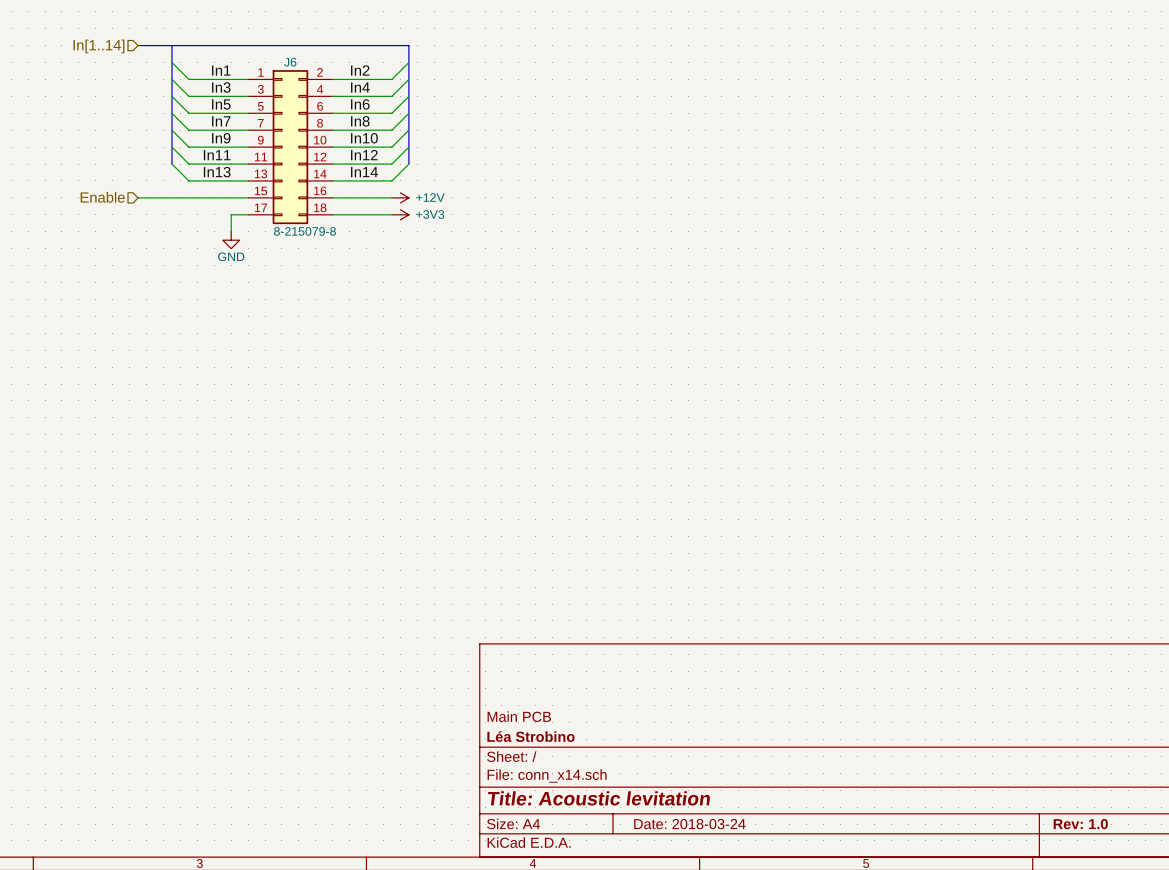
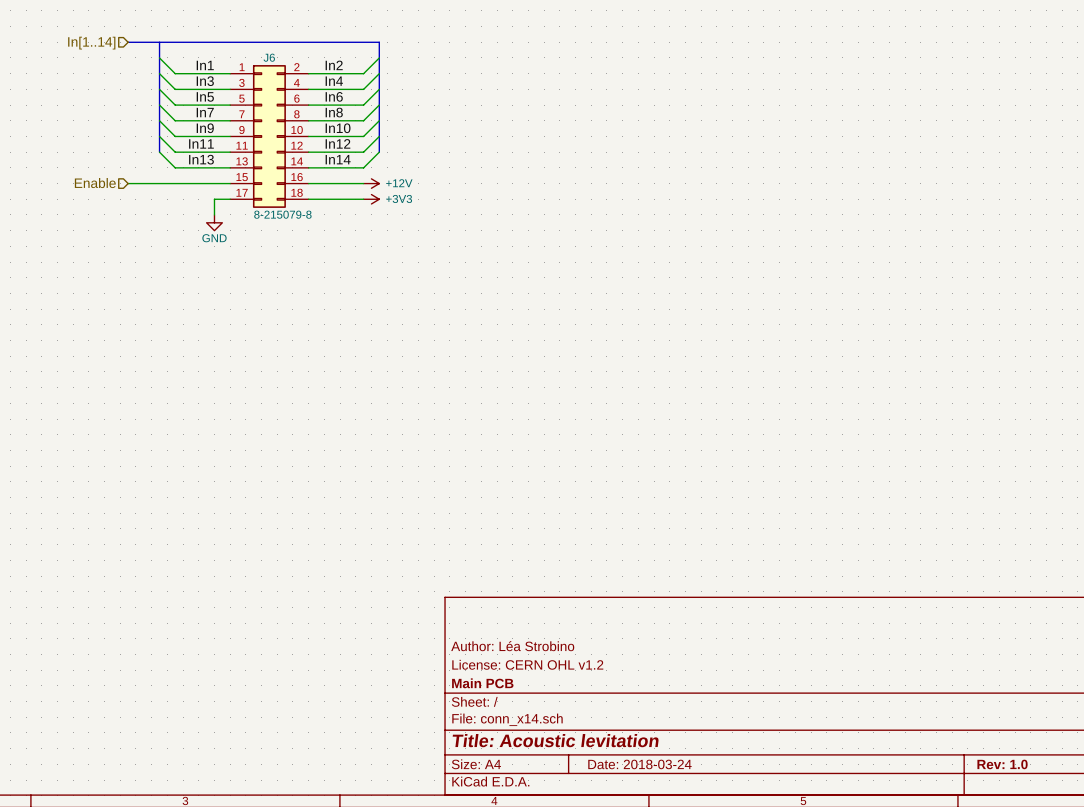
title block: none -> Author: Léa Strobino (512, 646)
title block: Main PCB (519, 716) -> License: CERN OHL v1.2 (527, 664)
title block: Léa Strobino (530, 736) -> Main PCB (482, 683)

